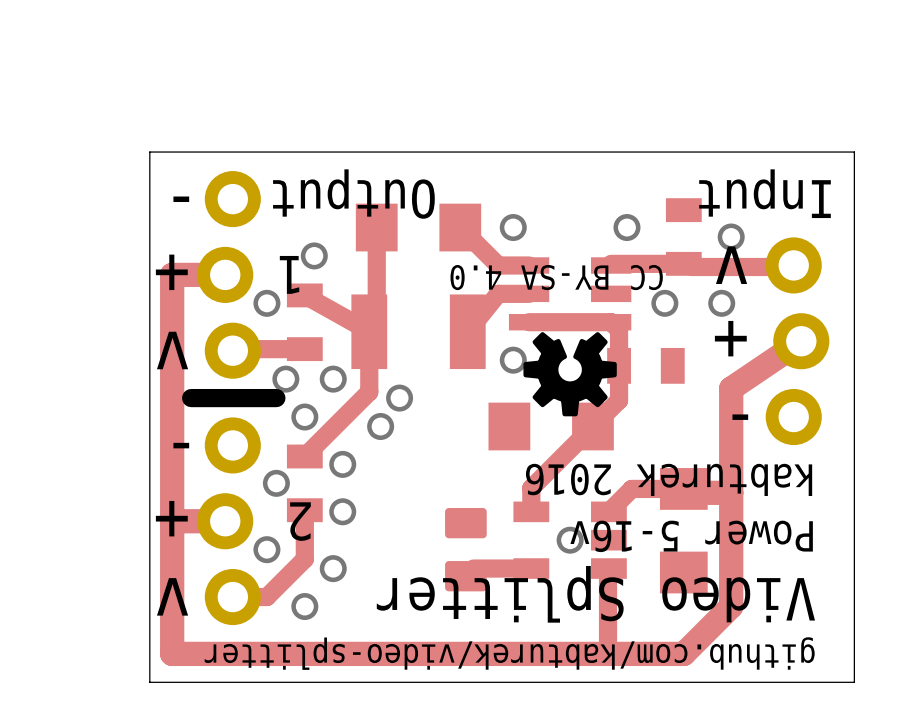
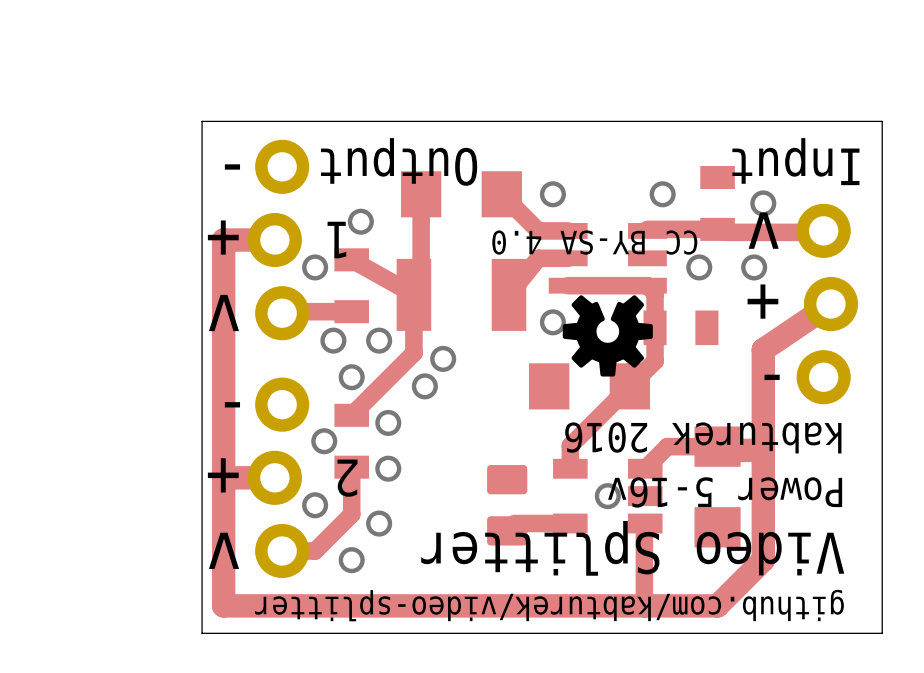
line: (276, 398) (191, 398) -> none

